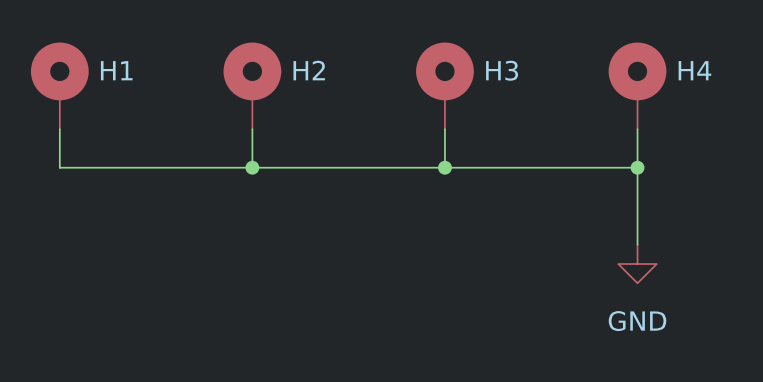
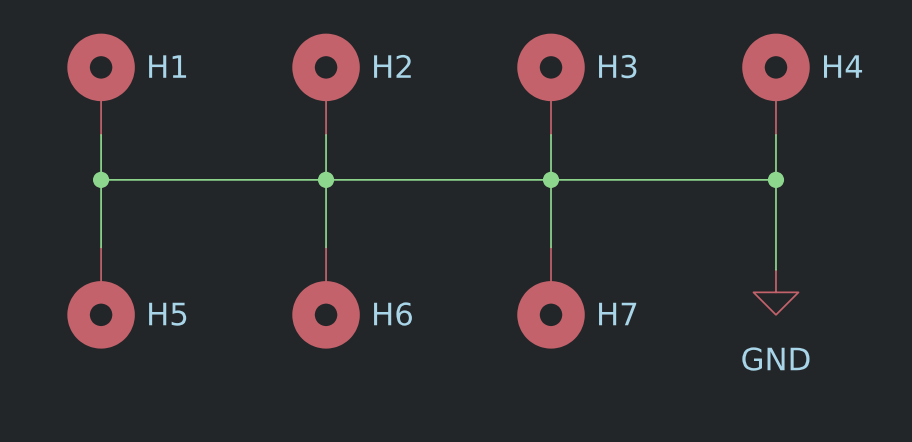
wire: none -> (101, 179) (101, 247)
junction: none -> (101, 179)
wire: none -> (326, 179) (326, 247)
wire: none -> (551, 179) (551, 247)
H5: none -> (101, 297)
H6: none -> (326, 297)
H7: none -> (551, 297)

